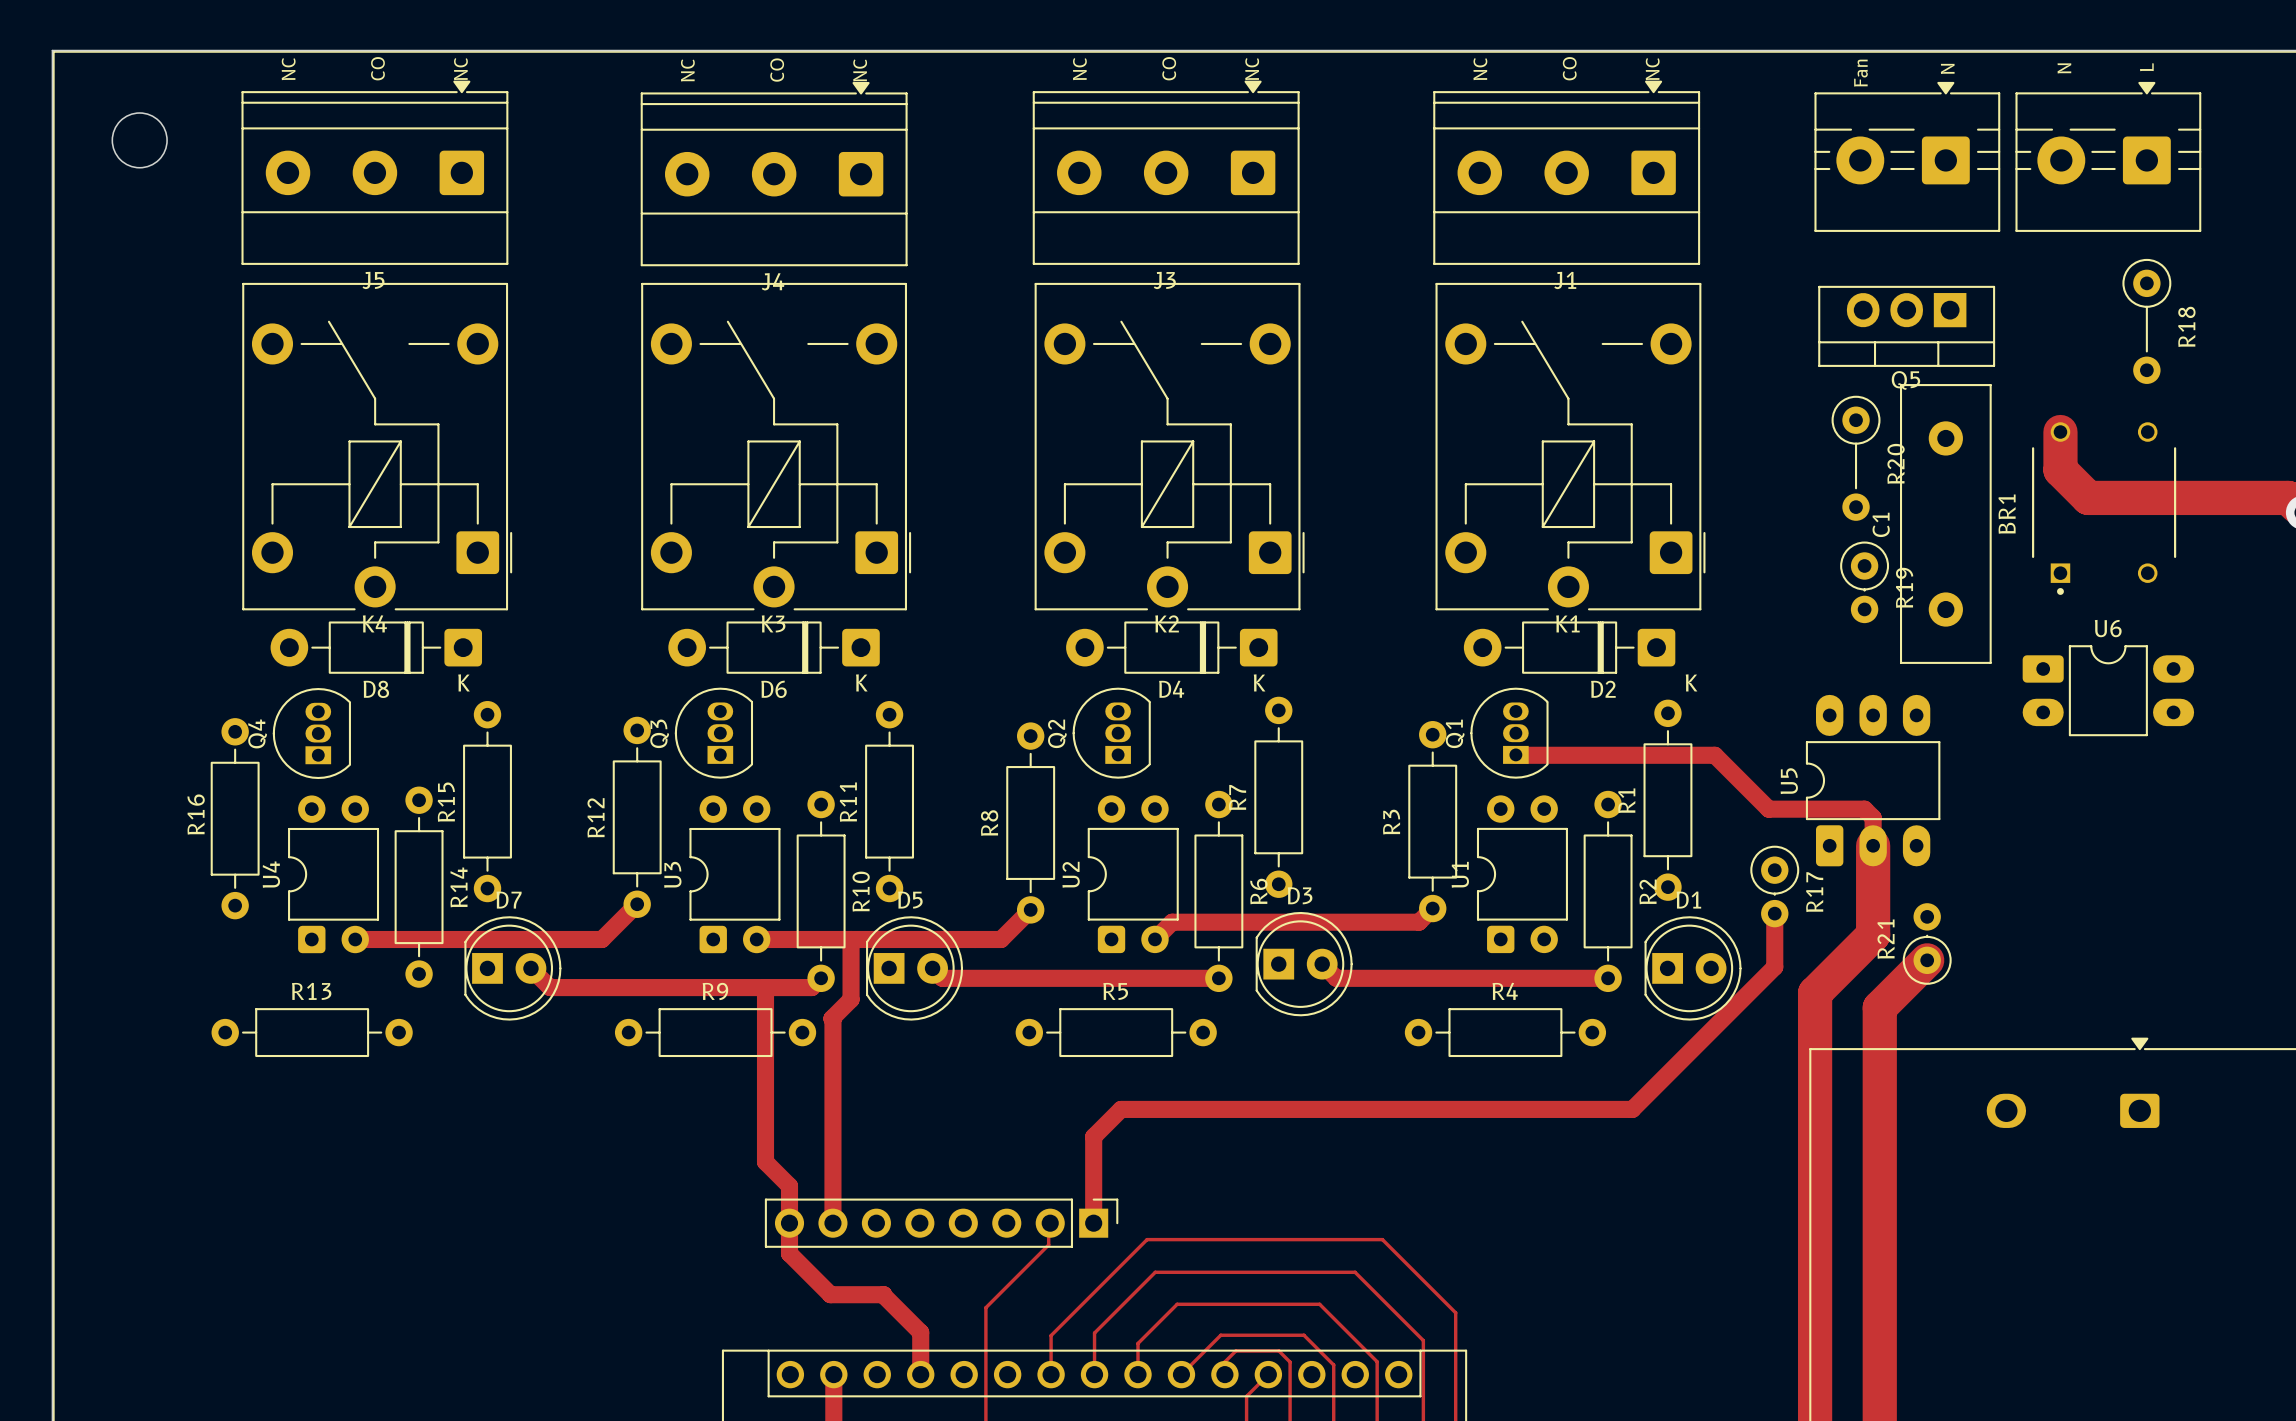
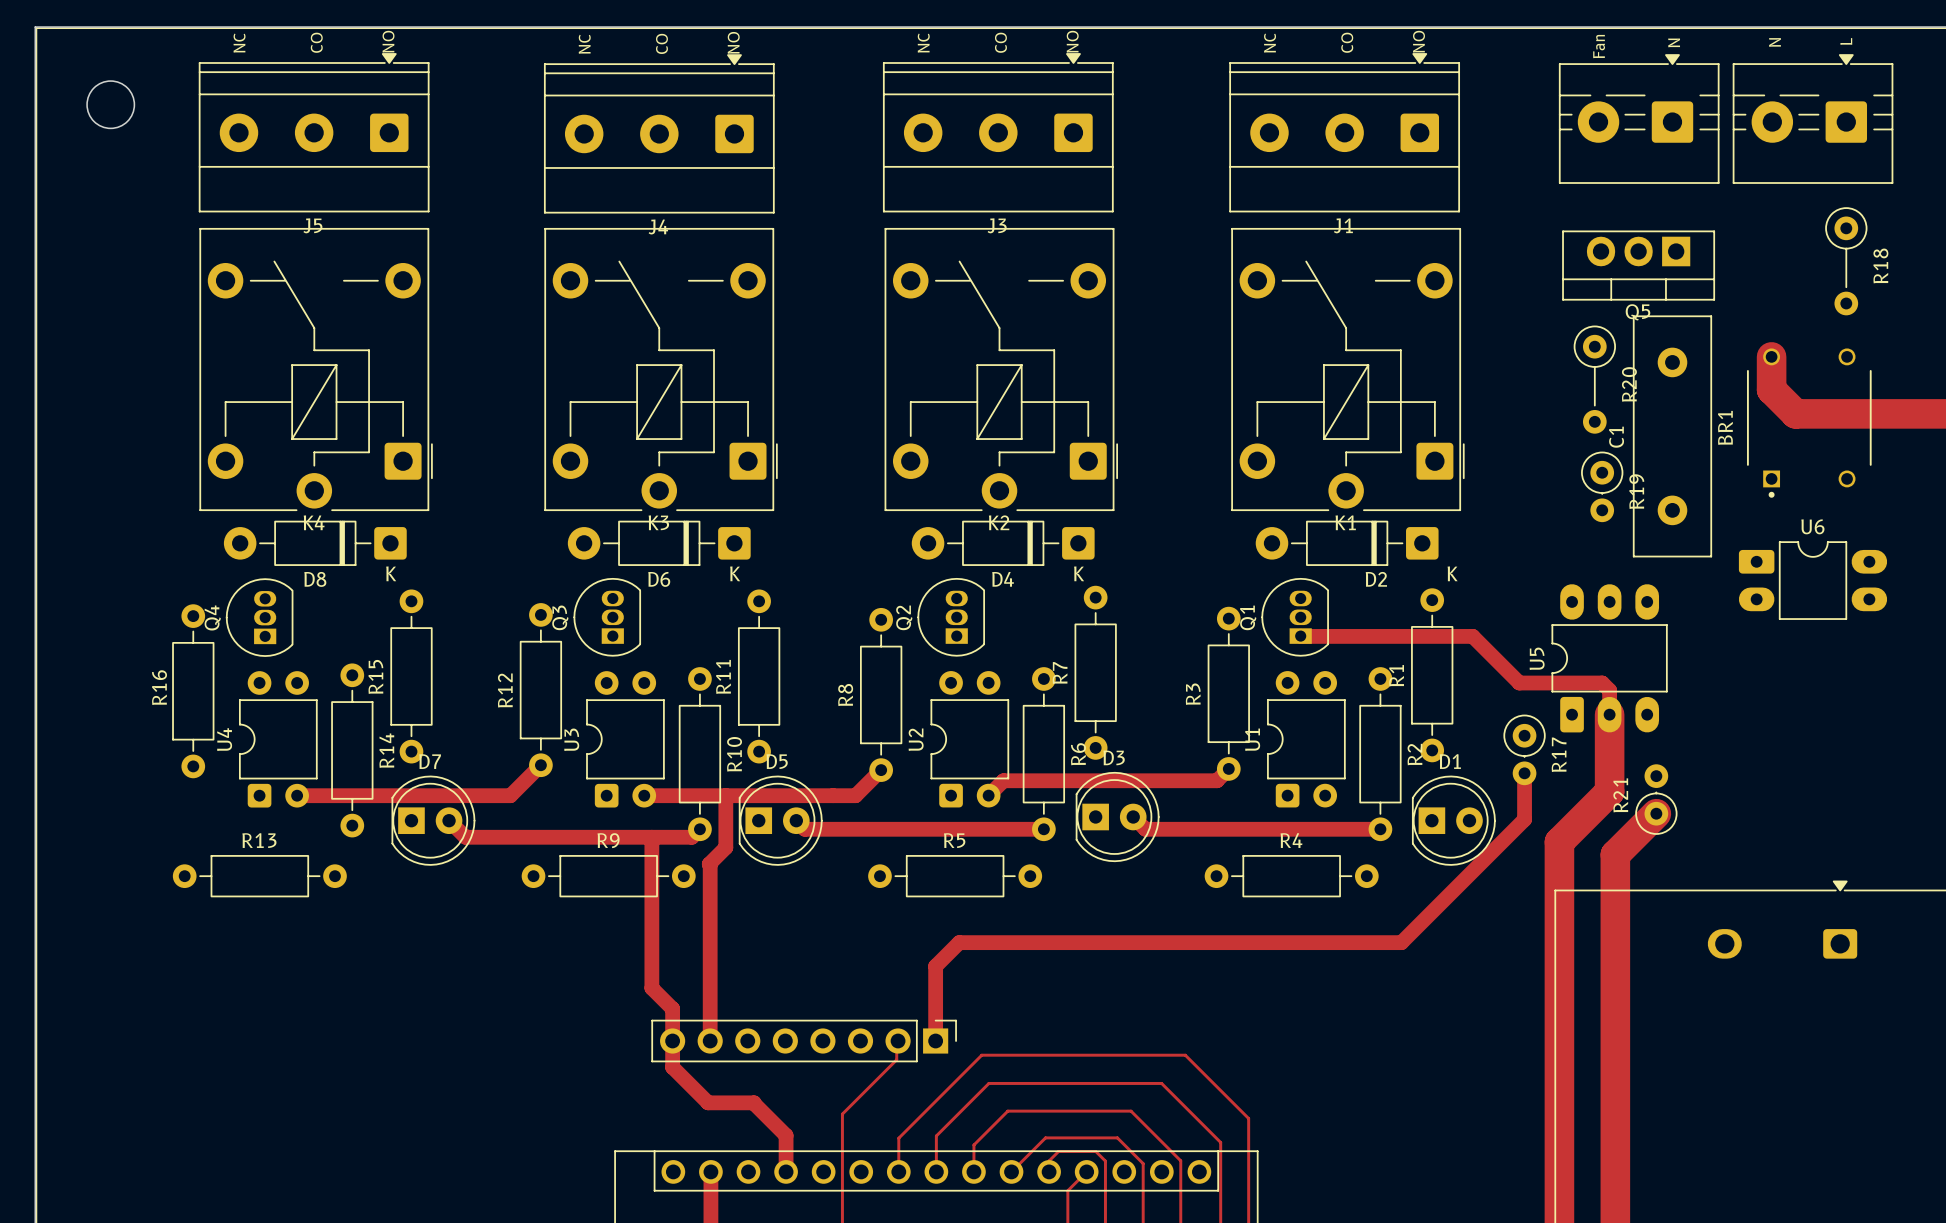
text: NC (460, 69) -> NO (388, 41)
text: NC (1252, 69) -> NO (1072, 41)
text: NC (1652, 69) -> NO (1418, 41)
text: NC (860, 70) -> NO (733, 42)

